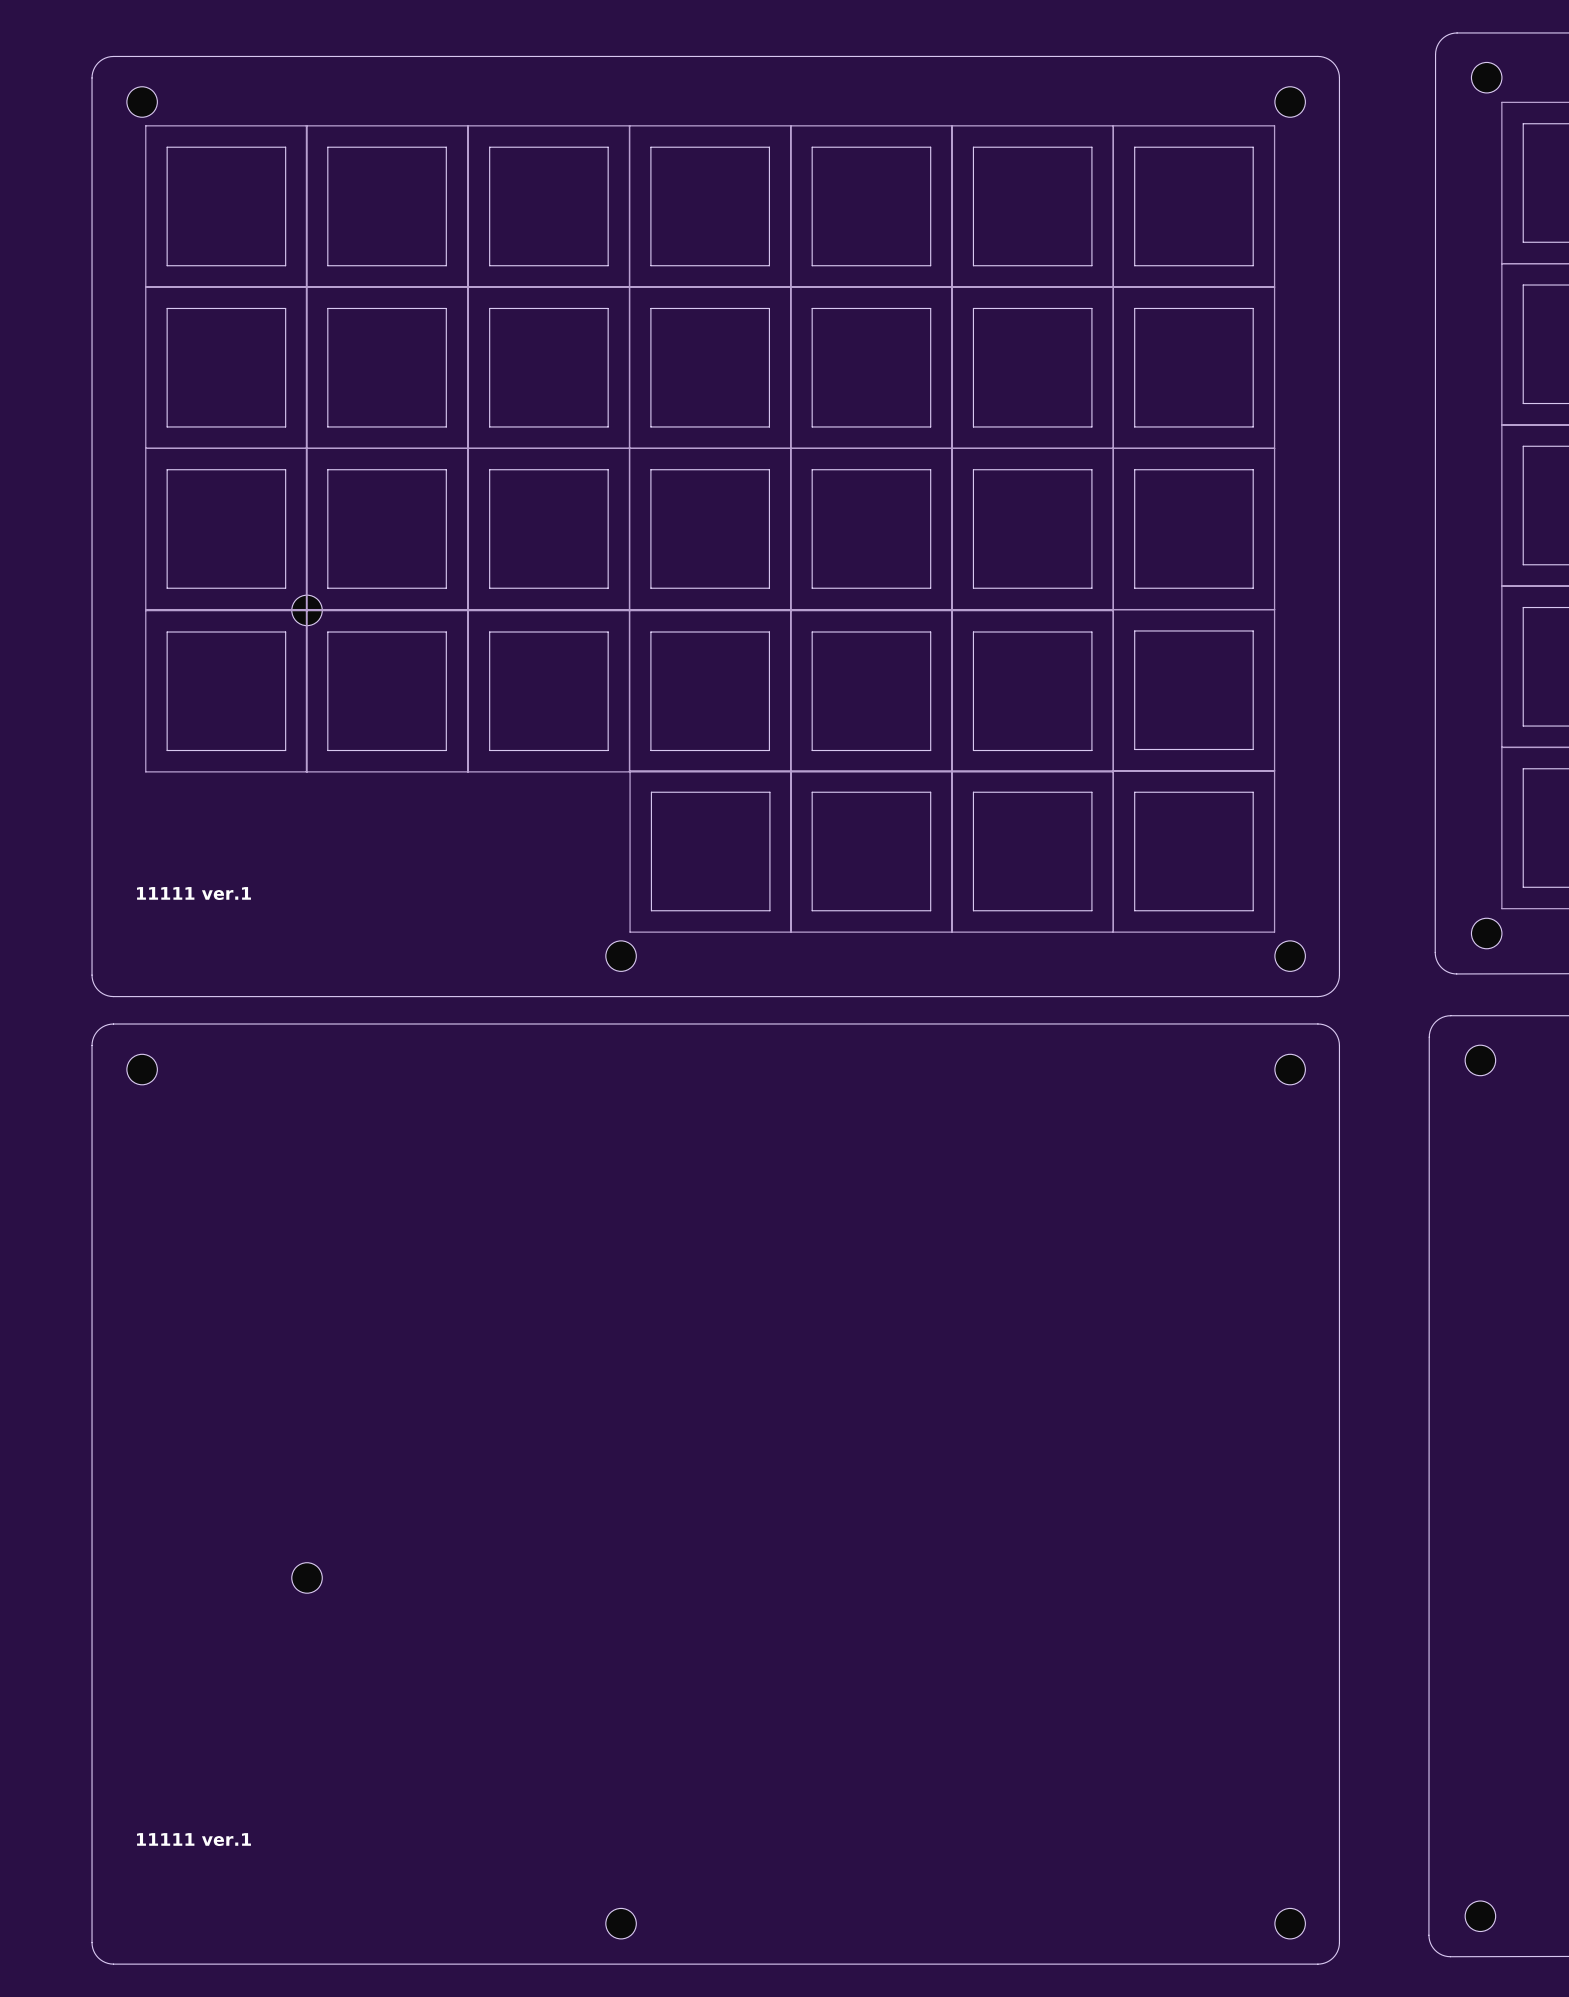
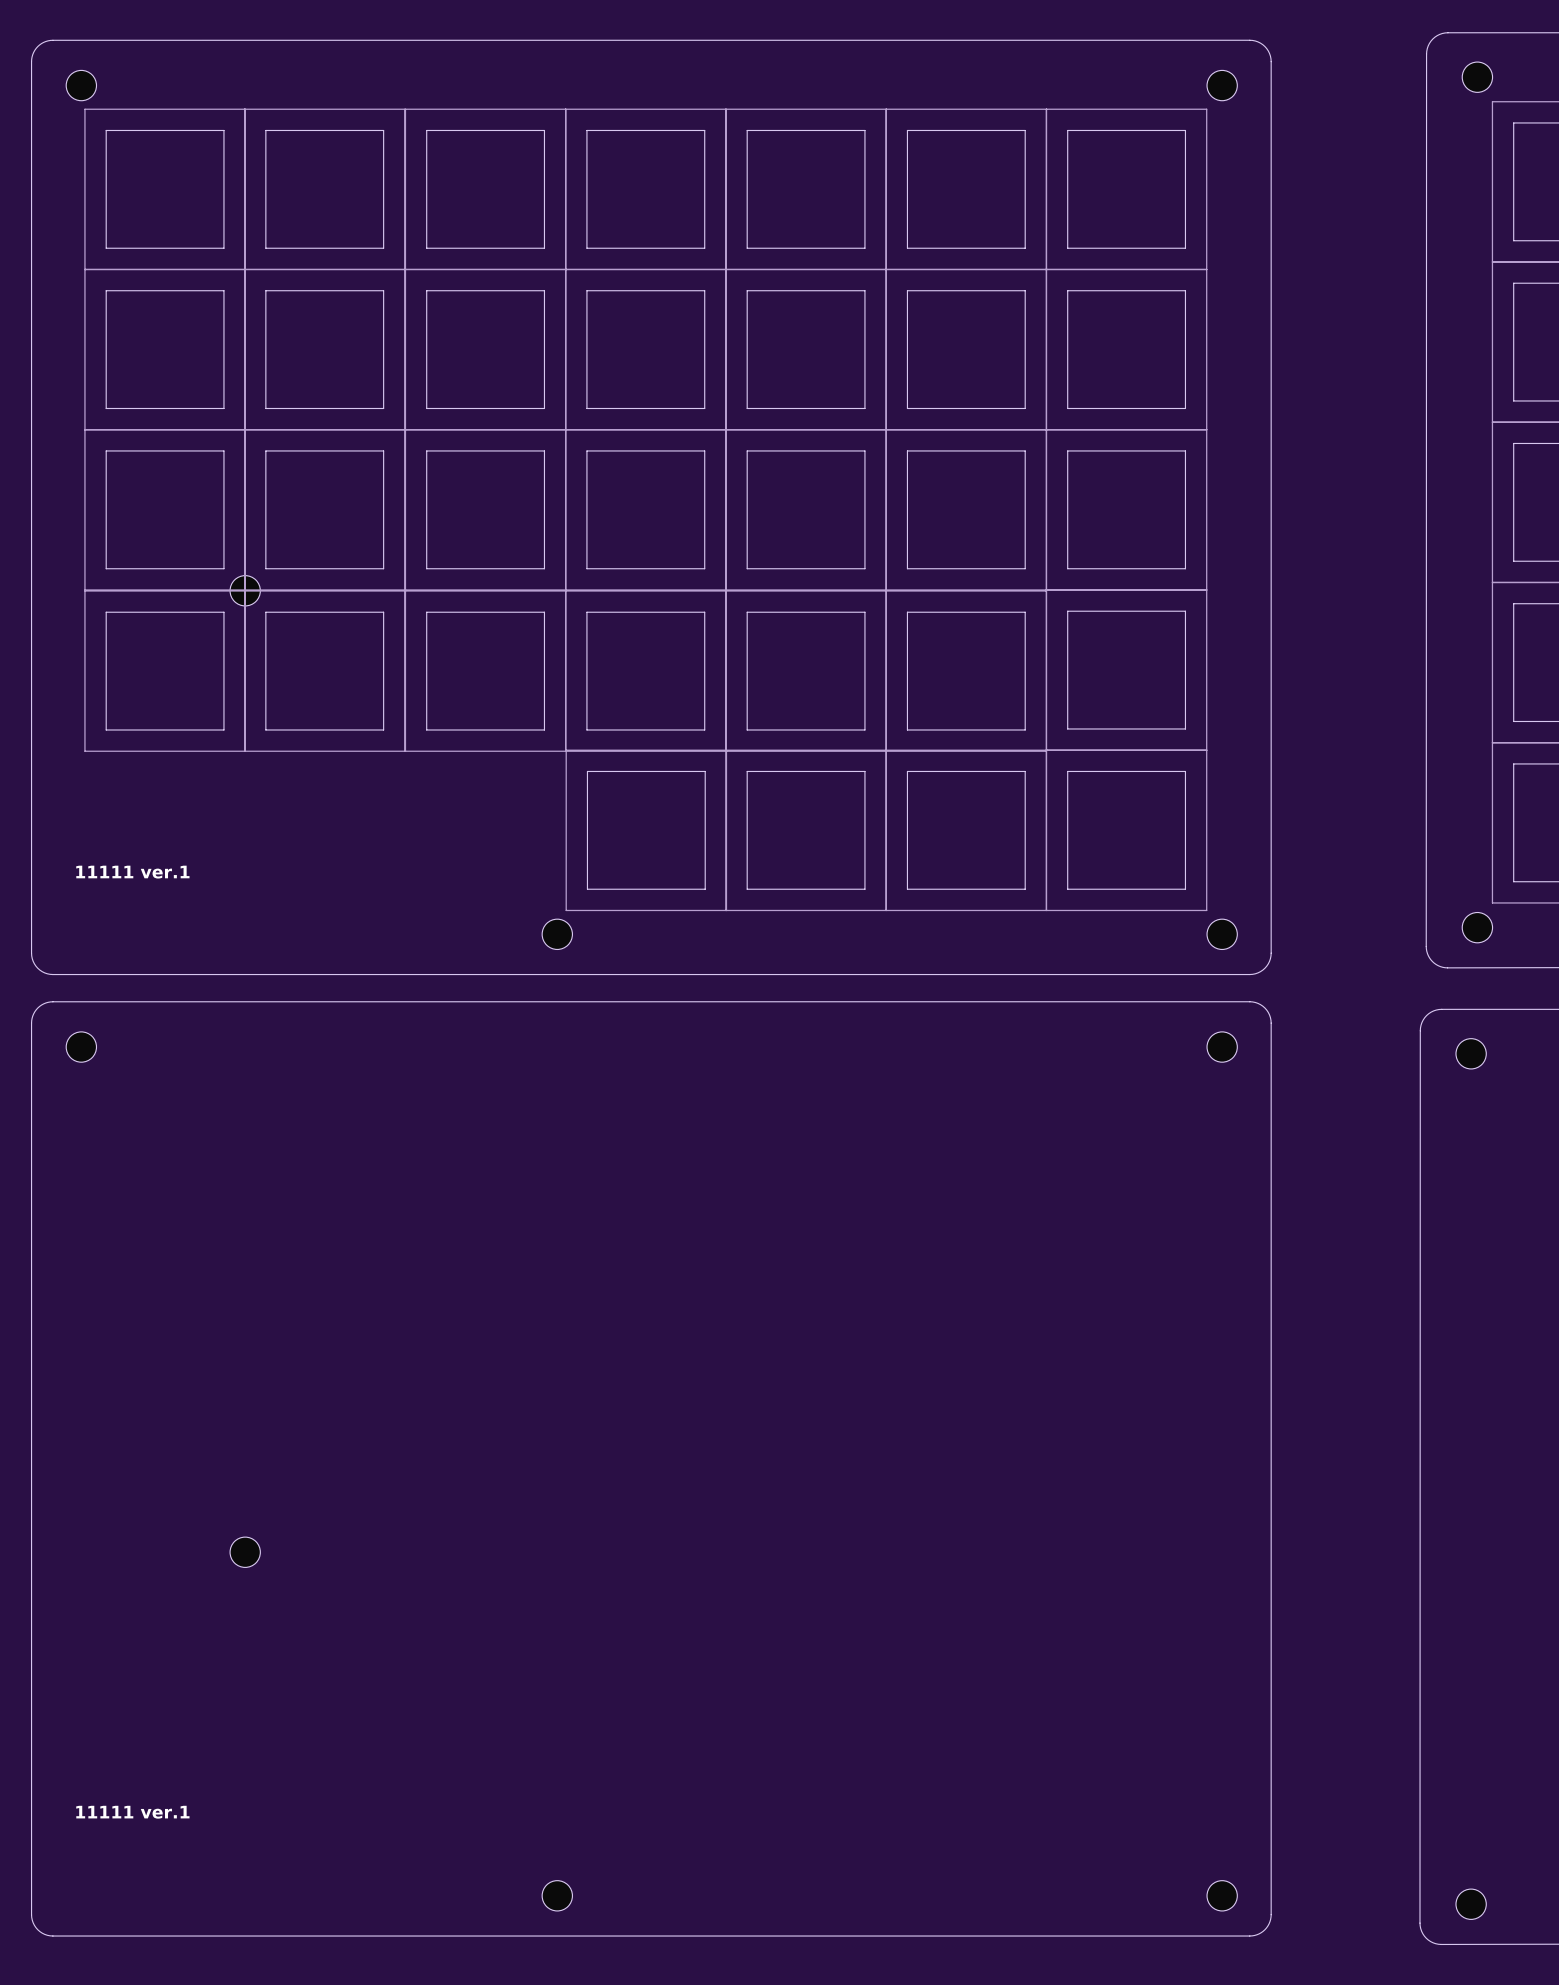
board edge: (1317, 56) (113, 56) (100, 60) (94, 67) (92, 77) (92, 975) (96, 988) (102, 993) (113, 996) (1317, 996) (1331, 992) (1336, 985) (1339, 975) (1339, 77) (1337, 69) (1333, 62) (1326, 58) (1317, 56) -> (1249, 40) (52, 40) (39, 44) (33, 52) (31, 61) (31, 953) (35, 966) (44, 972) (52, 974) (1249, 974) (1262, 970) (1268, 963) (1271, 953) (1271, 61) (1269, 53) (1264, 46) (1257, 41) (1249, 40)
part position: (142, 102) -> (81, 85)
part position: (1290, 102) -> (1222, 85)
drawing: none -> [84, 108, 1208, 912]
drawing: [145, 125, 1276, 933] -> none
part position: (307, 610) -> (245, 590)
text position: 11111 ver.1 (193, 893) -> 11111 ver.1 (132, 872)
part: none -> (1222, 934)
part position: (621, 956) -> (557, 934)
part: (1290, 956) -> none
board edge: (1317, 1023) (113, 1024) (100, 1028) (94, 1034) (92, 1045) (92, 1942) (96, 1955) (105, 1962) (113, 1964) (1317, 1964) (1331, 1959) (1337, 1951) (1339, 1942) (1339, 1045) (1337, 1037) (1333, 1030) (1326, 1025) (1317, 1023) -> (1249, 1001) (52, 1001) (39, 1006) (33, 1013) (31, 1023) (31, 1914) (35, 1927) (42, 1933) (52, 1936) (1249, 1936) (1263, 1931) (1269, 1923) (1271, 1914) (1271, 1023) (1269, 1014) (1264, 1008) (1257, 1003) (1249, 1001)
part: none -> (1222, 1047)
part position: (142, 1069) -> (81, 1047)
part: (1290, 1069) -> none
part position: (307, 1577) -> (245, 1552)
text position: 11111 ver.1 (193, 1839) -> 11111 ver.1 (132, 1812)
part position: (621, 1923) -> (557, 1895)
part position: (1290, 1923) -> (1222, 1895)

